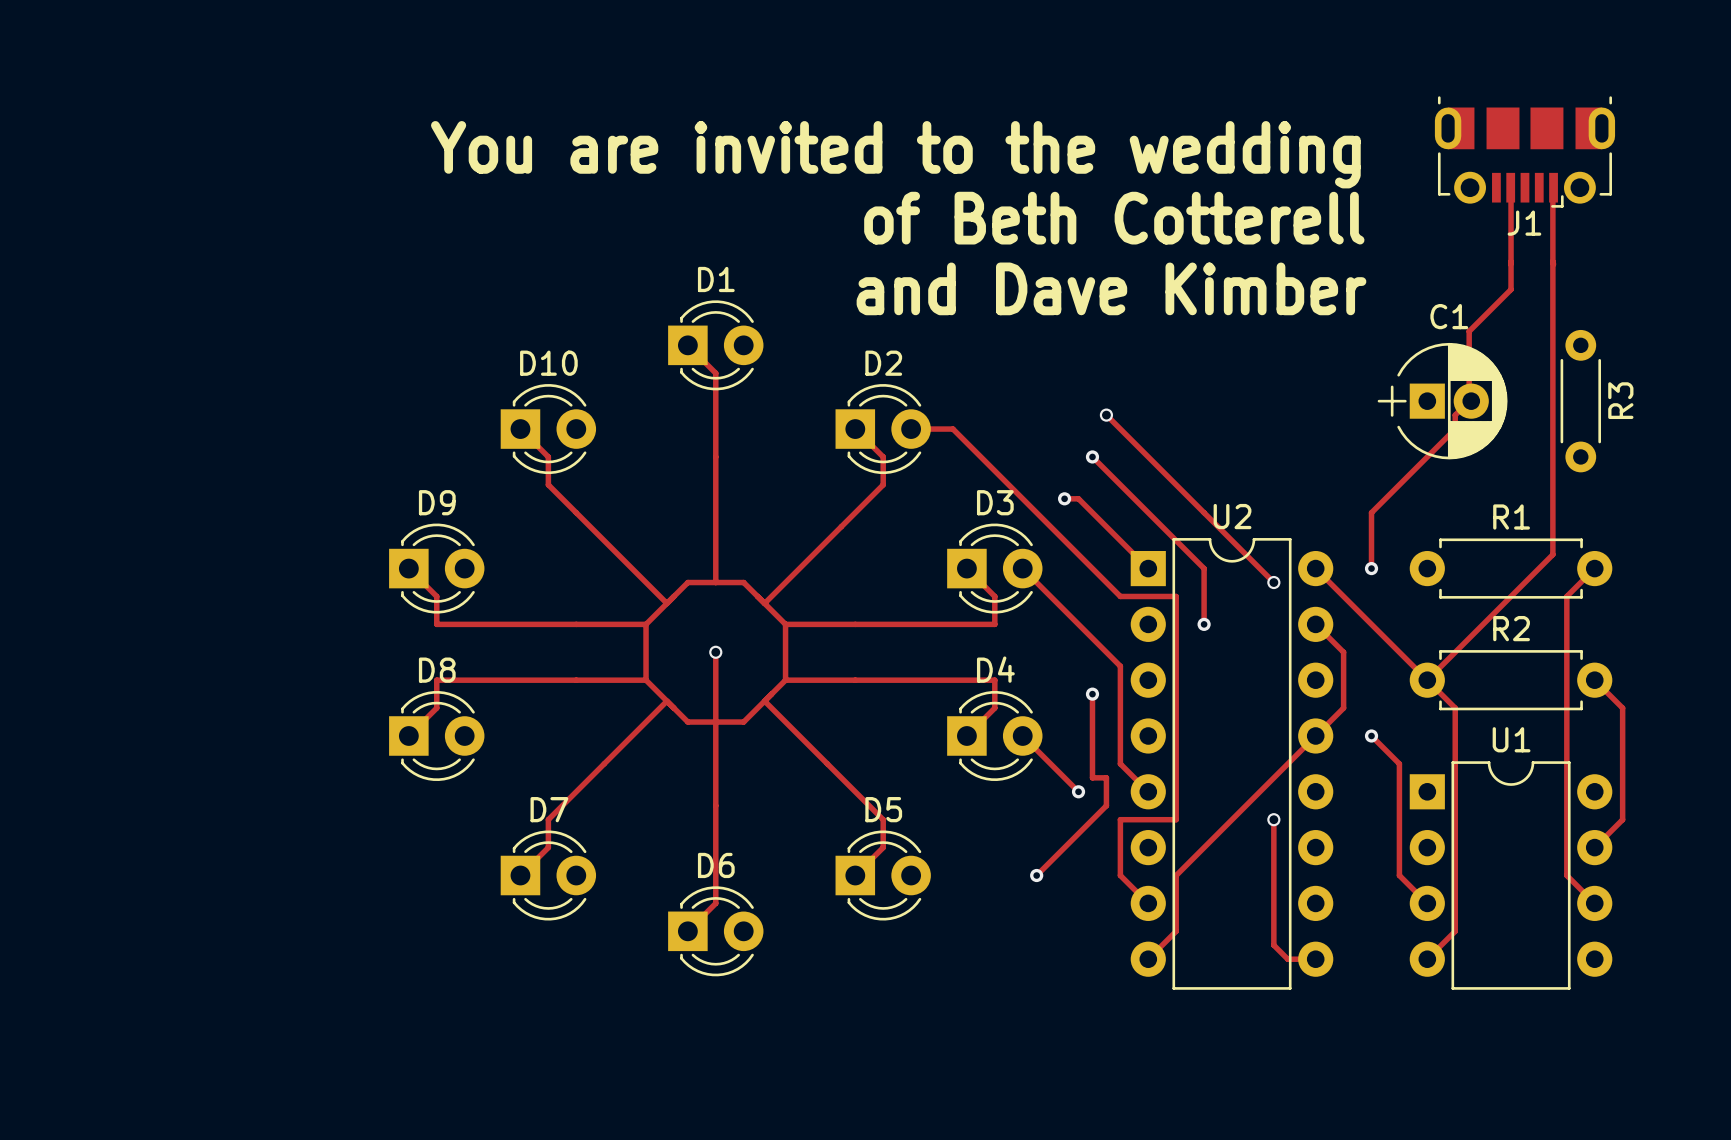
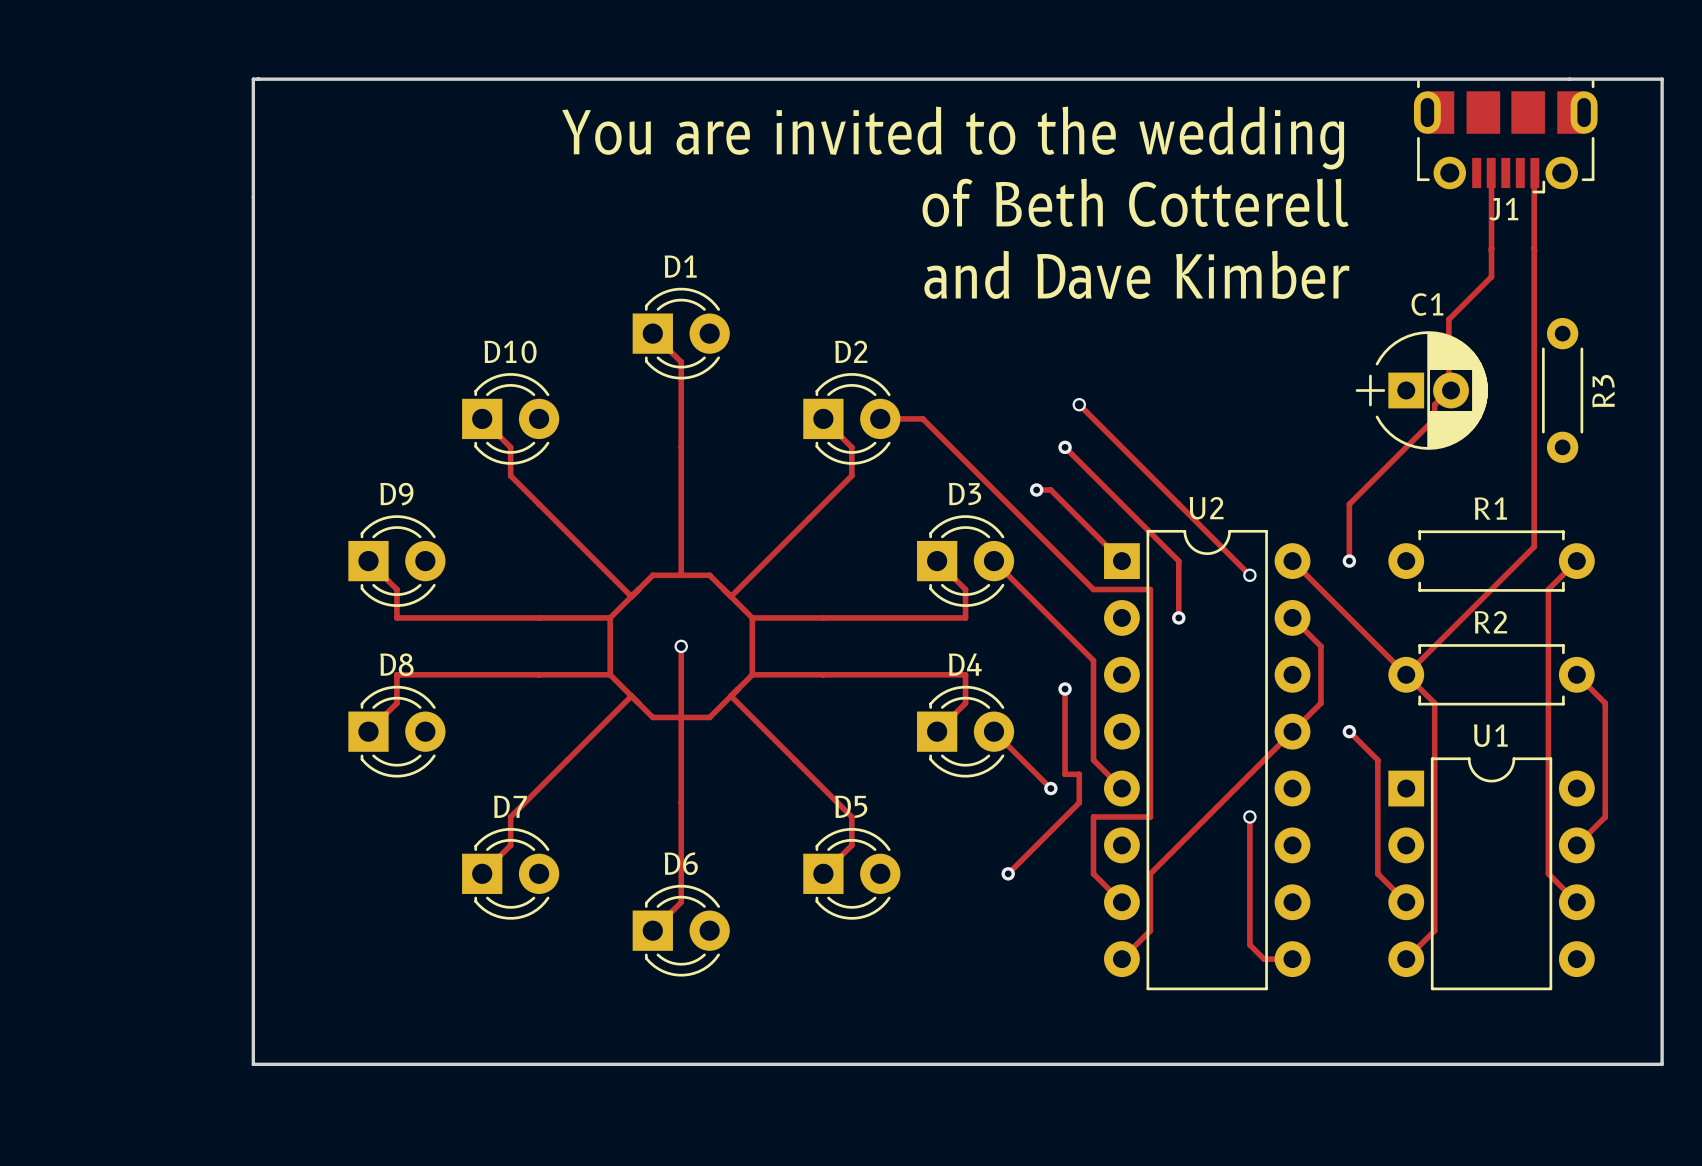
board edge: none -> (253, 79) (1662, 79) (1662, 1064) (253, 1064) (253, 79)

